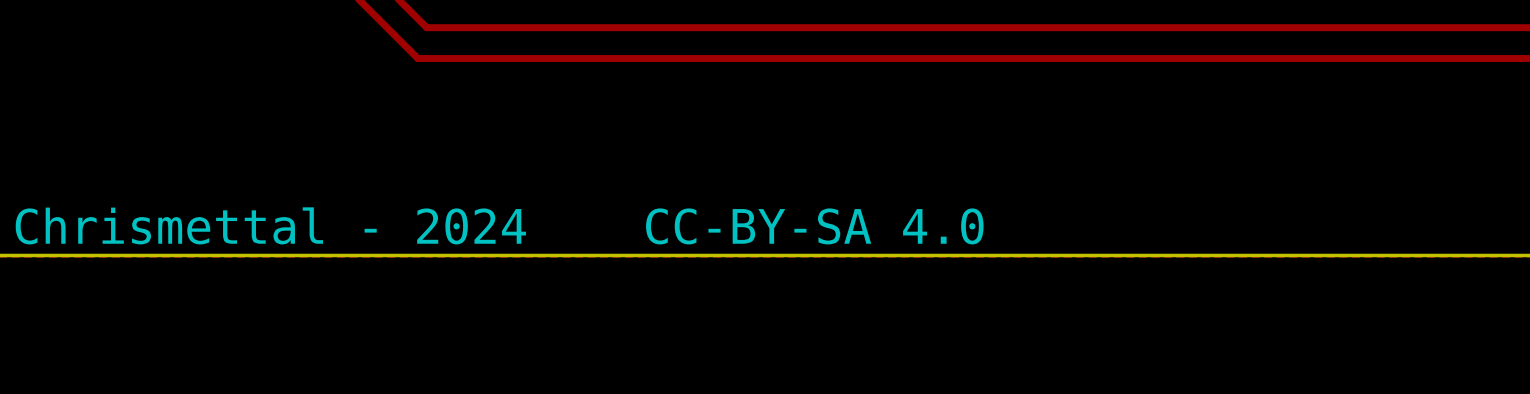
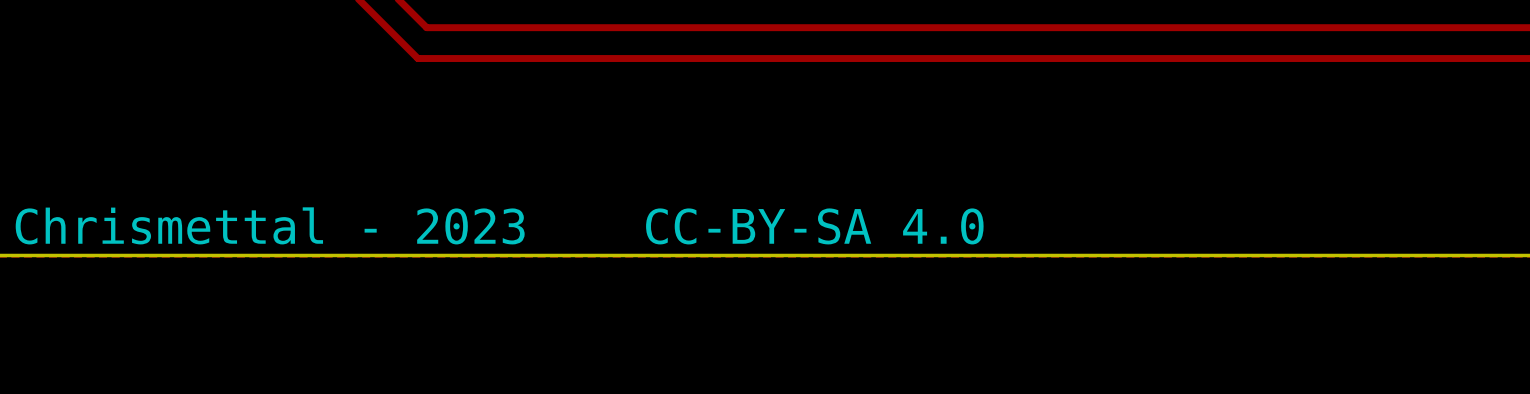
text: Chrismettal - 2024 CC-BY-SA 4.0 (499, 225) -> Chrismettal - 2023 CC-BY-SA 4.0 (499, 225)

